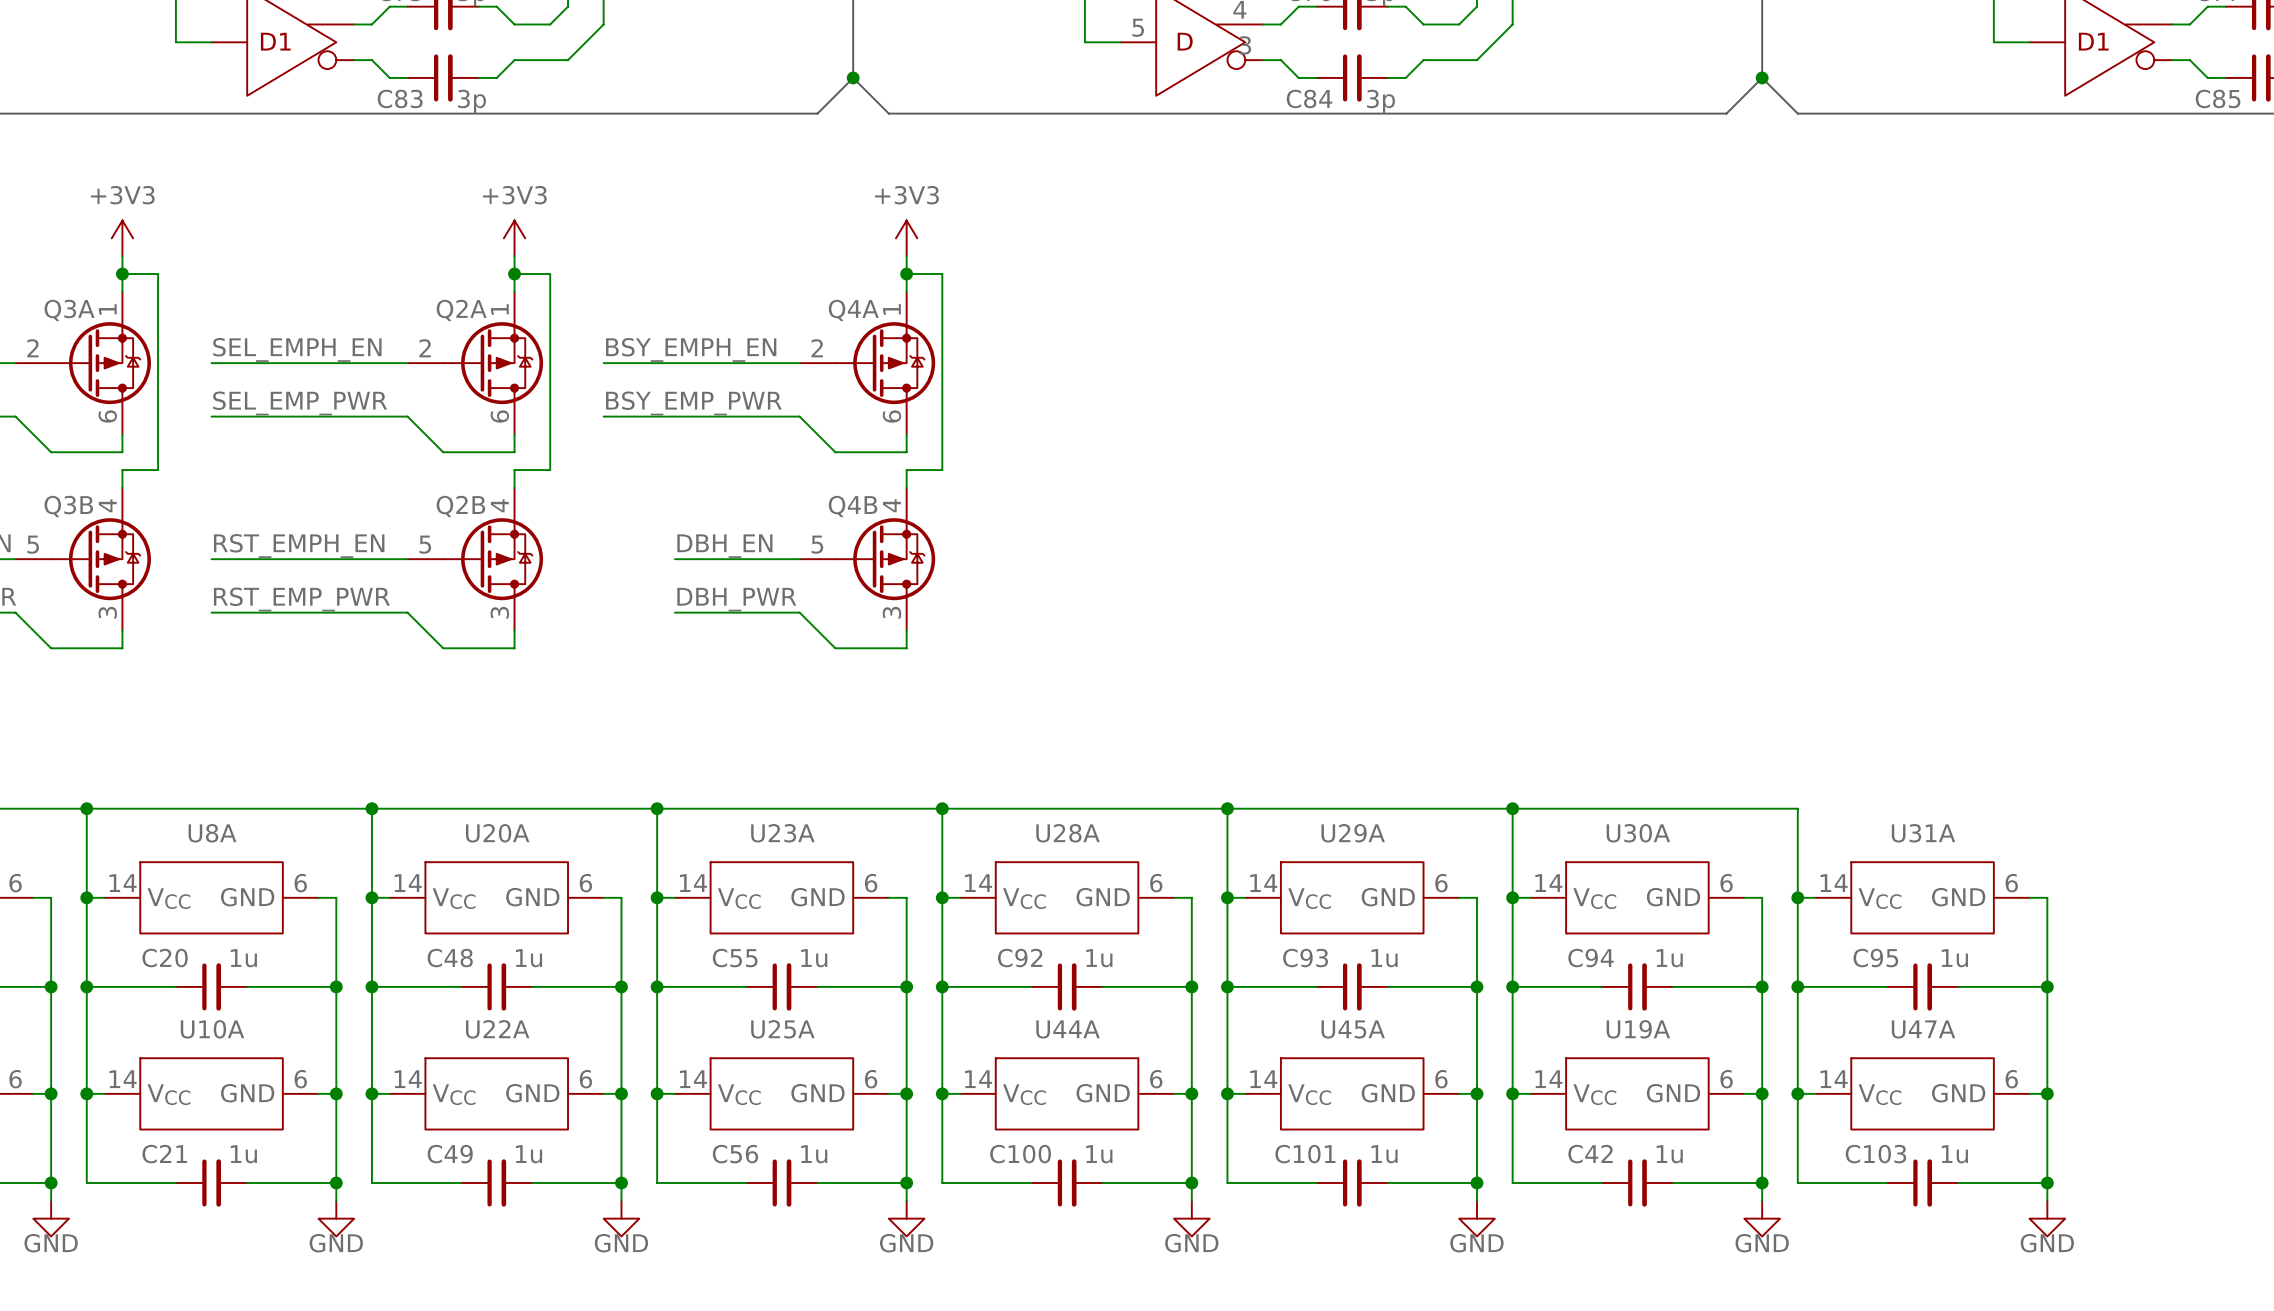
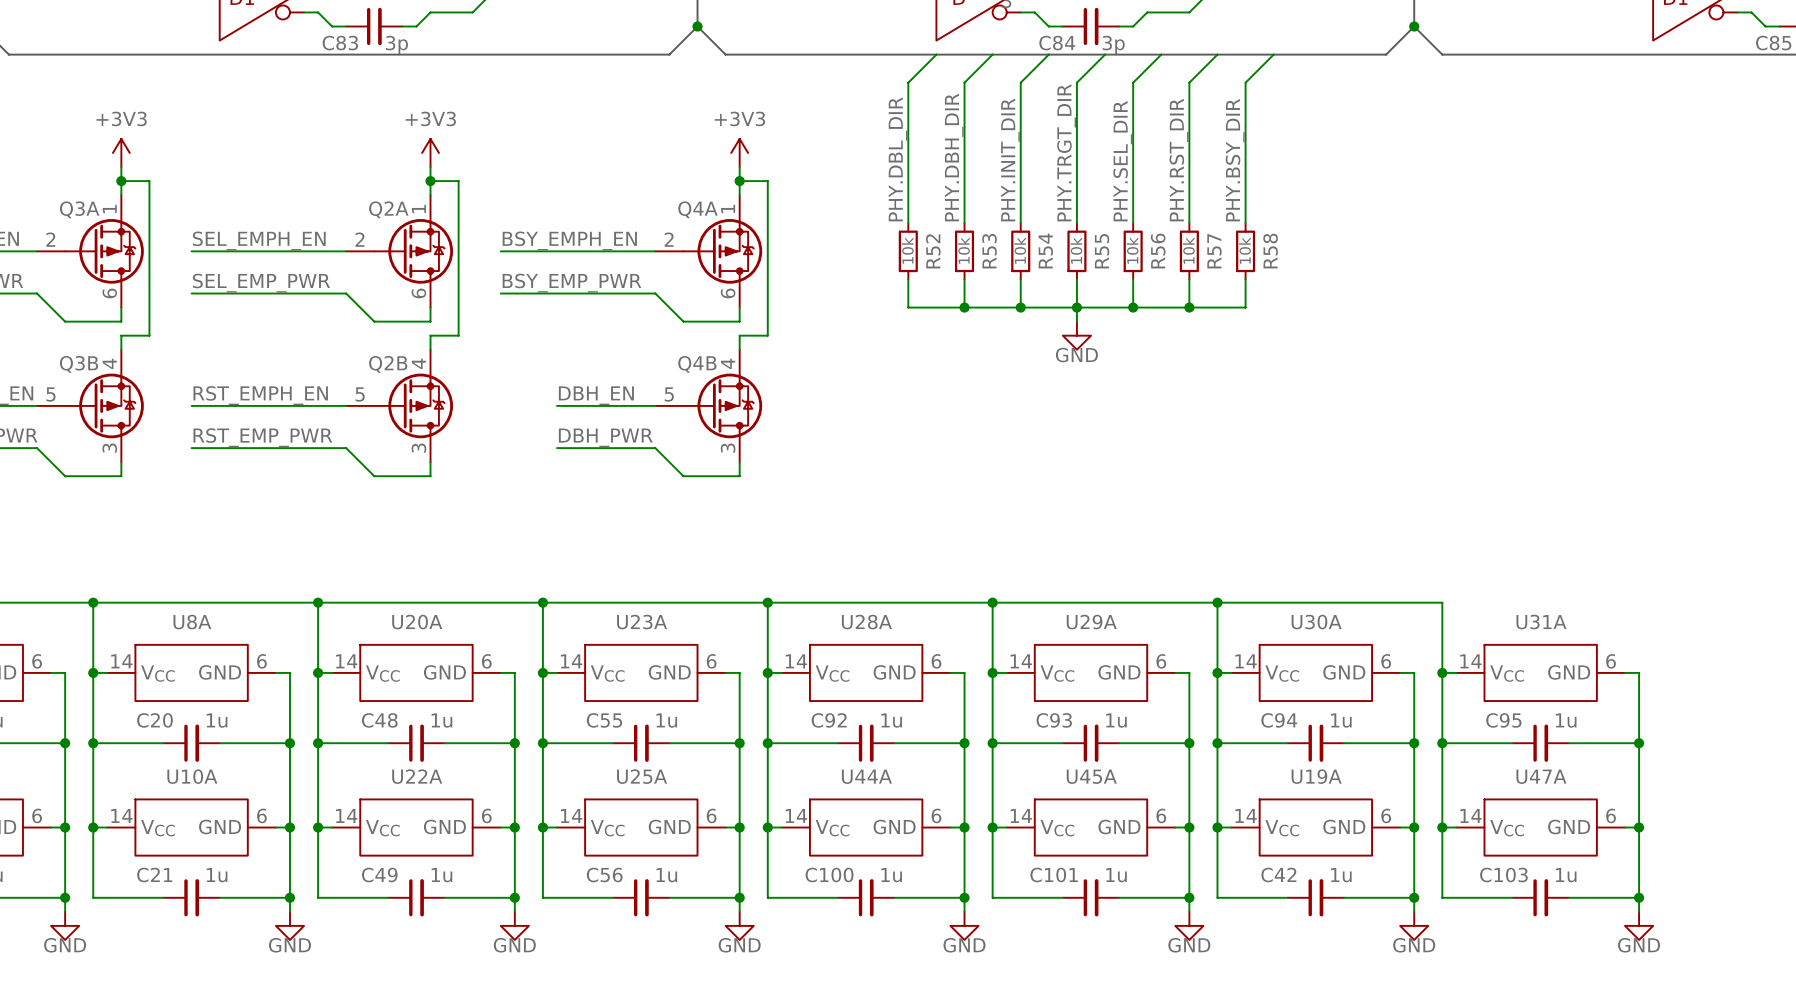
wire: none -> (936, 54) (908, 82) (908, 223)
wire: none -> (992, 54) (964, 82) (964, 223)
wire: none -> (1048, 54) (1020, 82) (1020, 223)
wire: none -> (1105, 54) (1076, 82) (1076, 223)
wire: none -> (1161, 54) (1133, 82) (1133, 223)
wire: none -> (1217, 54) (1189, 82) (1189, 223)
wire: none -> (1273, 54) (1245, 82) (1245, 223)
label: none -> PHY.TRGT_DIR (1066, 152)
label: none -> PHY.DBH_DIR (954, 157)
label: none -> PHY.DBL_DIR (898, 159)
label: none -> PHY.INIT_DIR (1010, 160)
label: none -> PHY.RST_DIR (1178, 160)
label: none -> PHY.BSY_DIR (1235, 160)
label: none -> PHY.SEL_DIR (1122, 161)
R52: none -> 10k (908, 251)
R53: none -> 10k (964, 251)
R54: none -> 10k (1020, 251)
R55: none -> 10k (1076, 251)
R56: none -> 10k (1133, 251)
R57: none -> 10k (1189, 251)
R58: none -> 10k (1245, 251)
wire: none -> (908, 279) (908, 307) (1245, 307) (1245, 279)
wire: none -> (964, 279) (964, 307)
wire: none -> (1020, 279) (1020, 307)
wire: none -> (1076, 279) (1076, 321)
wire: none -> (1133, 279) (1133, 307)
wire: none -> (1189, 279) (1189, 307)
junction: none -> (964, 307)
junction: none -> (1020, 307)
junction: none -> (1076, 307)
junction: none -> (1133, 307)
junction: none -> (1189, 307)
power symbol: none -> GND (1076, 335)

